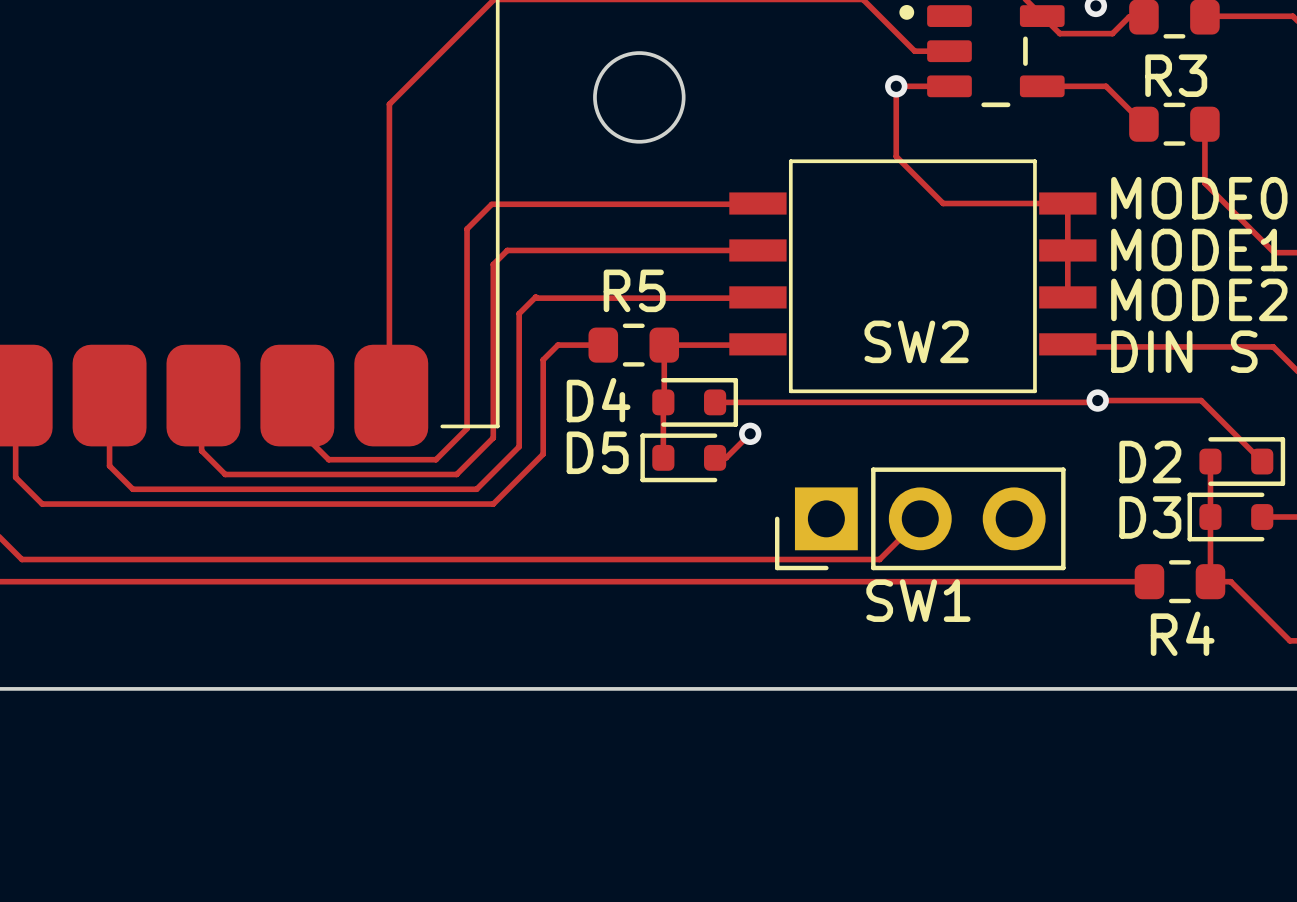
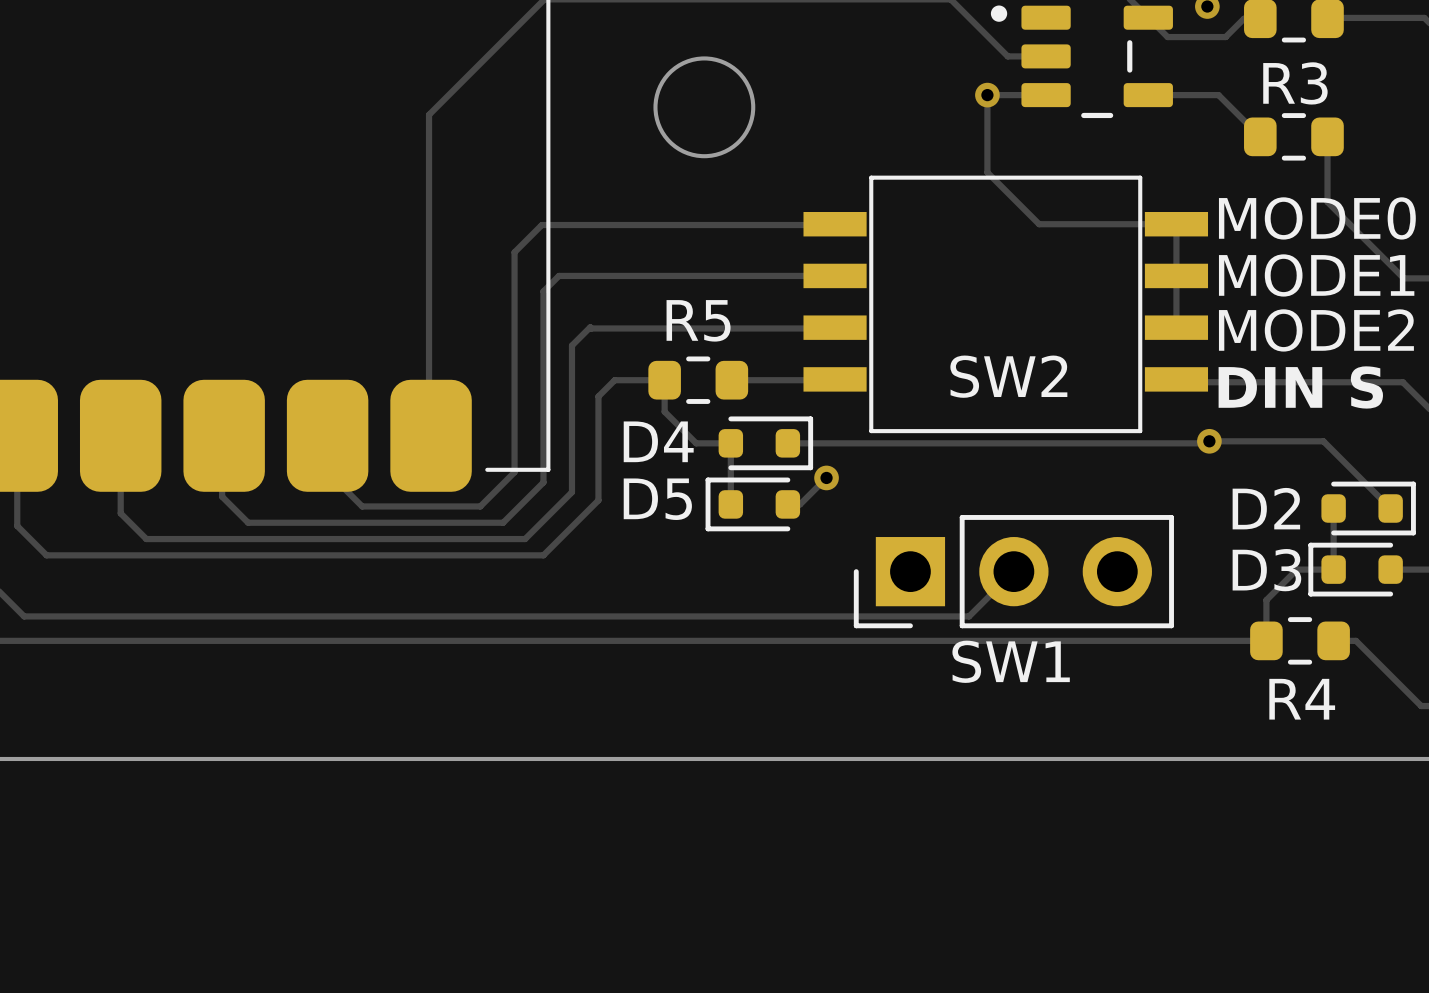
track: (664, 345) (664, 401) -> (664, 380) (664, 411) (696, 443) (730, 443)
track: (1210, 517) (1210, 581) -> (1333, 569) (1296, 569) (1266, 600) (1266, 640)

